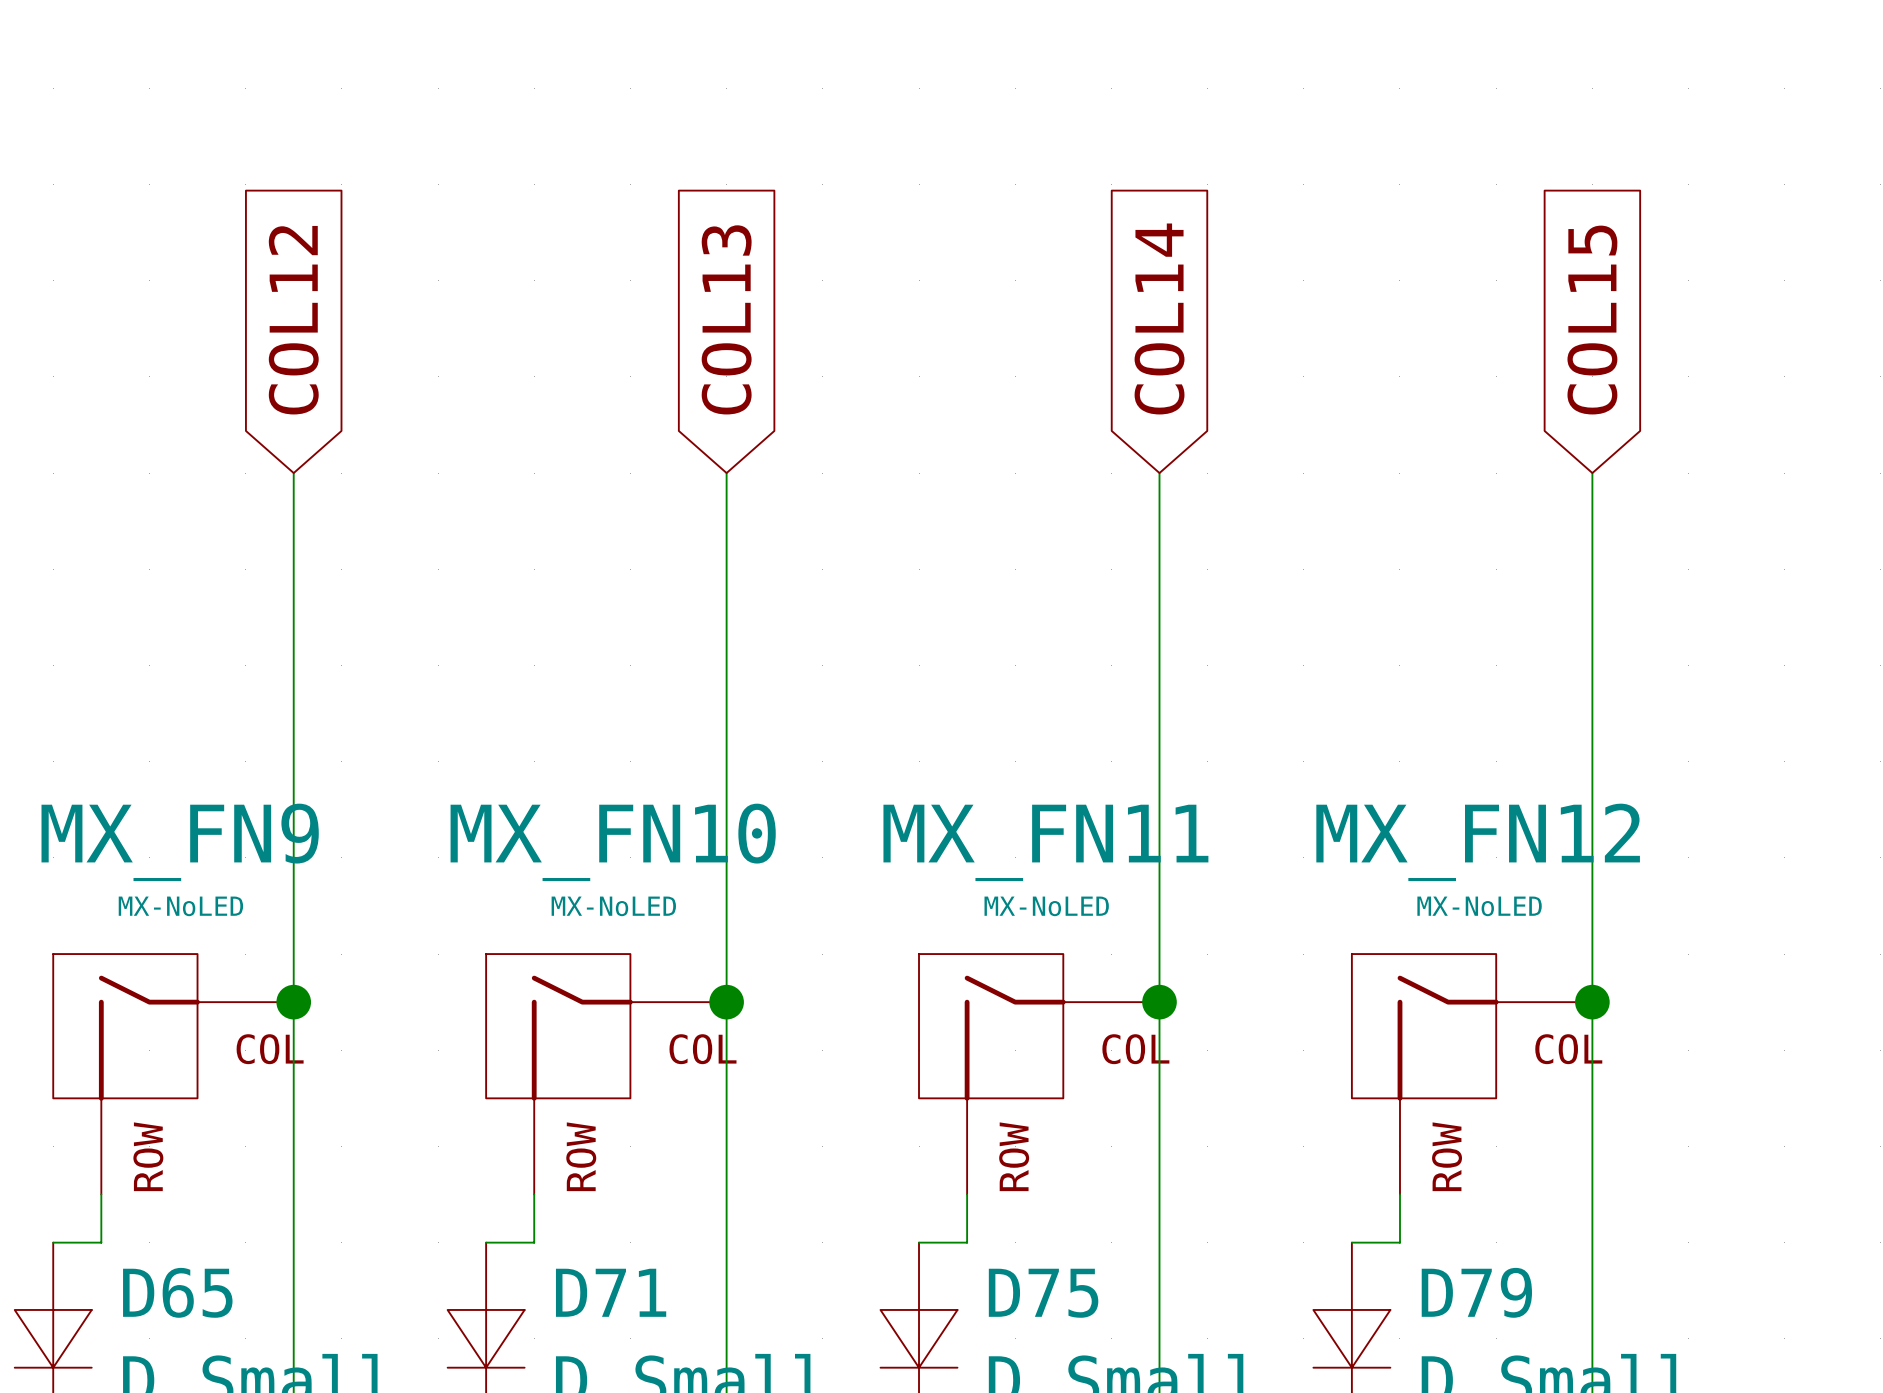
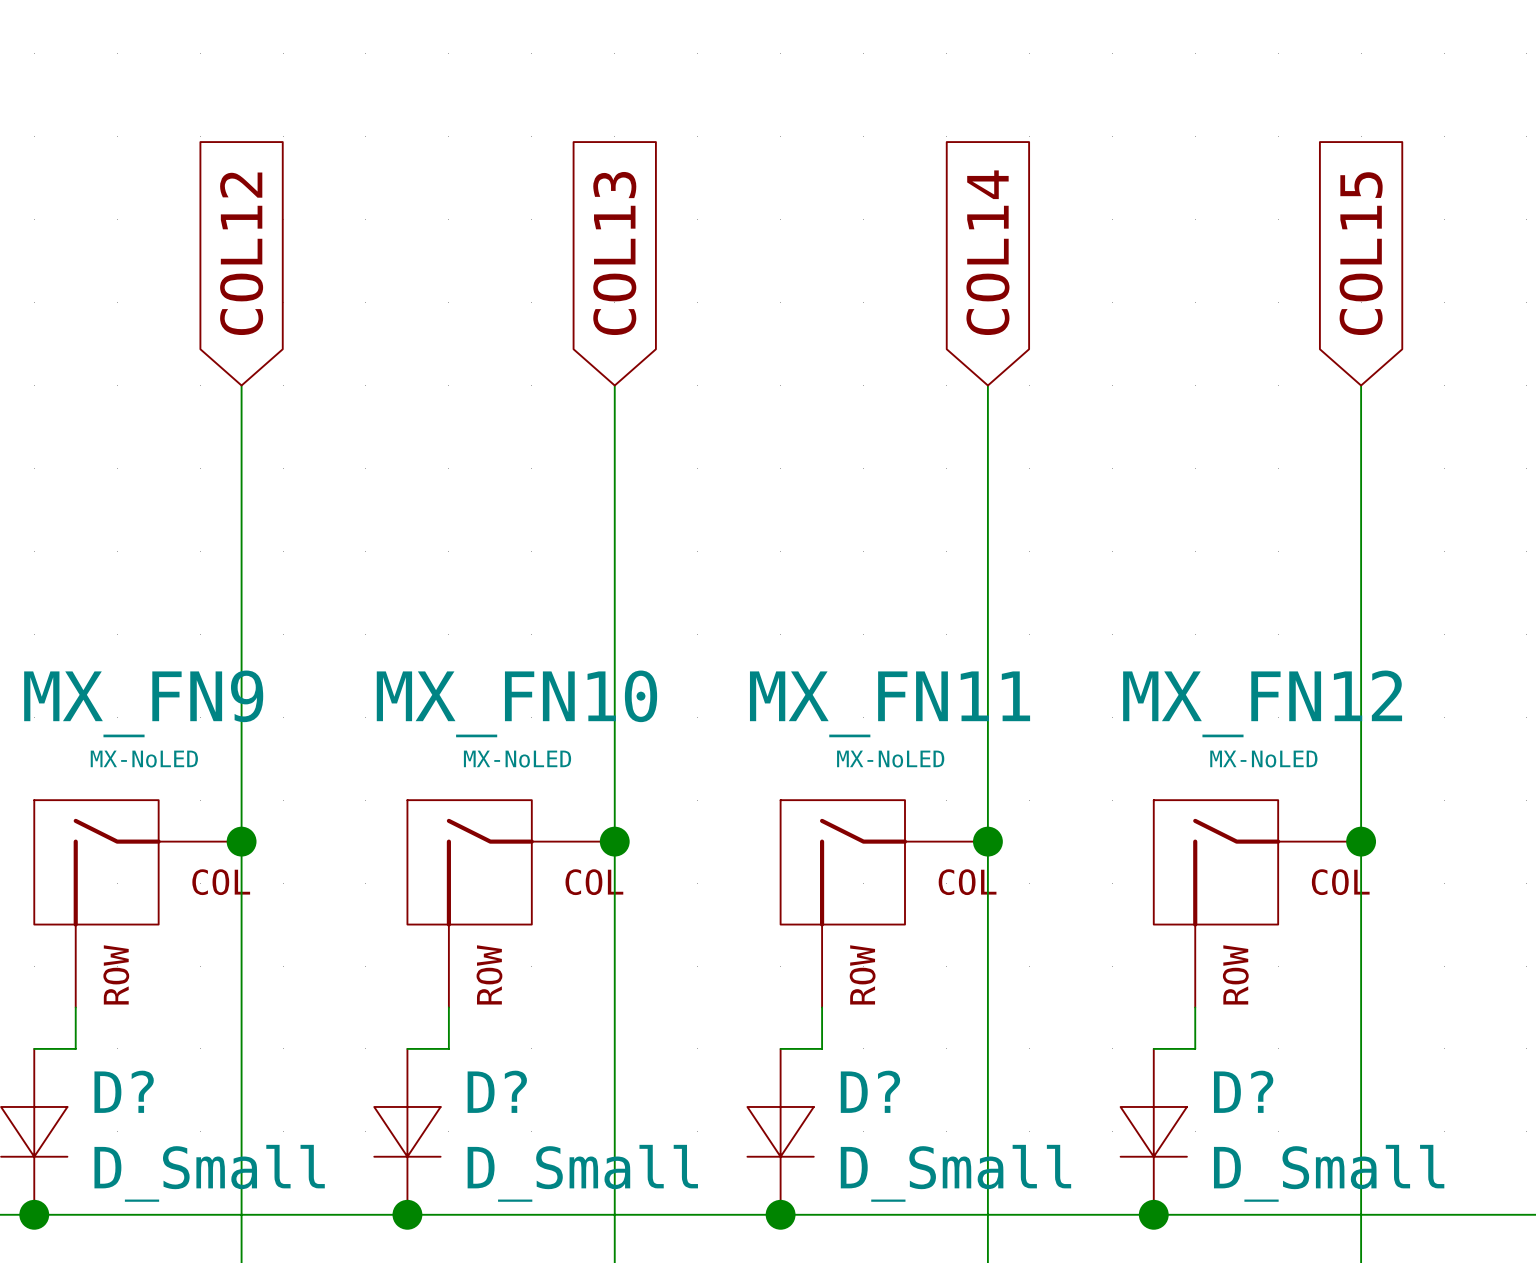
D65 name: D65 (177, 1292) -> D? (124, 1091)
D71 name: D71 (611, 1292) -> D? (497, 1091)
D79 name: D79 (1476, 1292) -> D? (1243, 1091)
D75 name: D75 (1043, 1293) -> D? (870, 1091)

